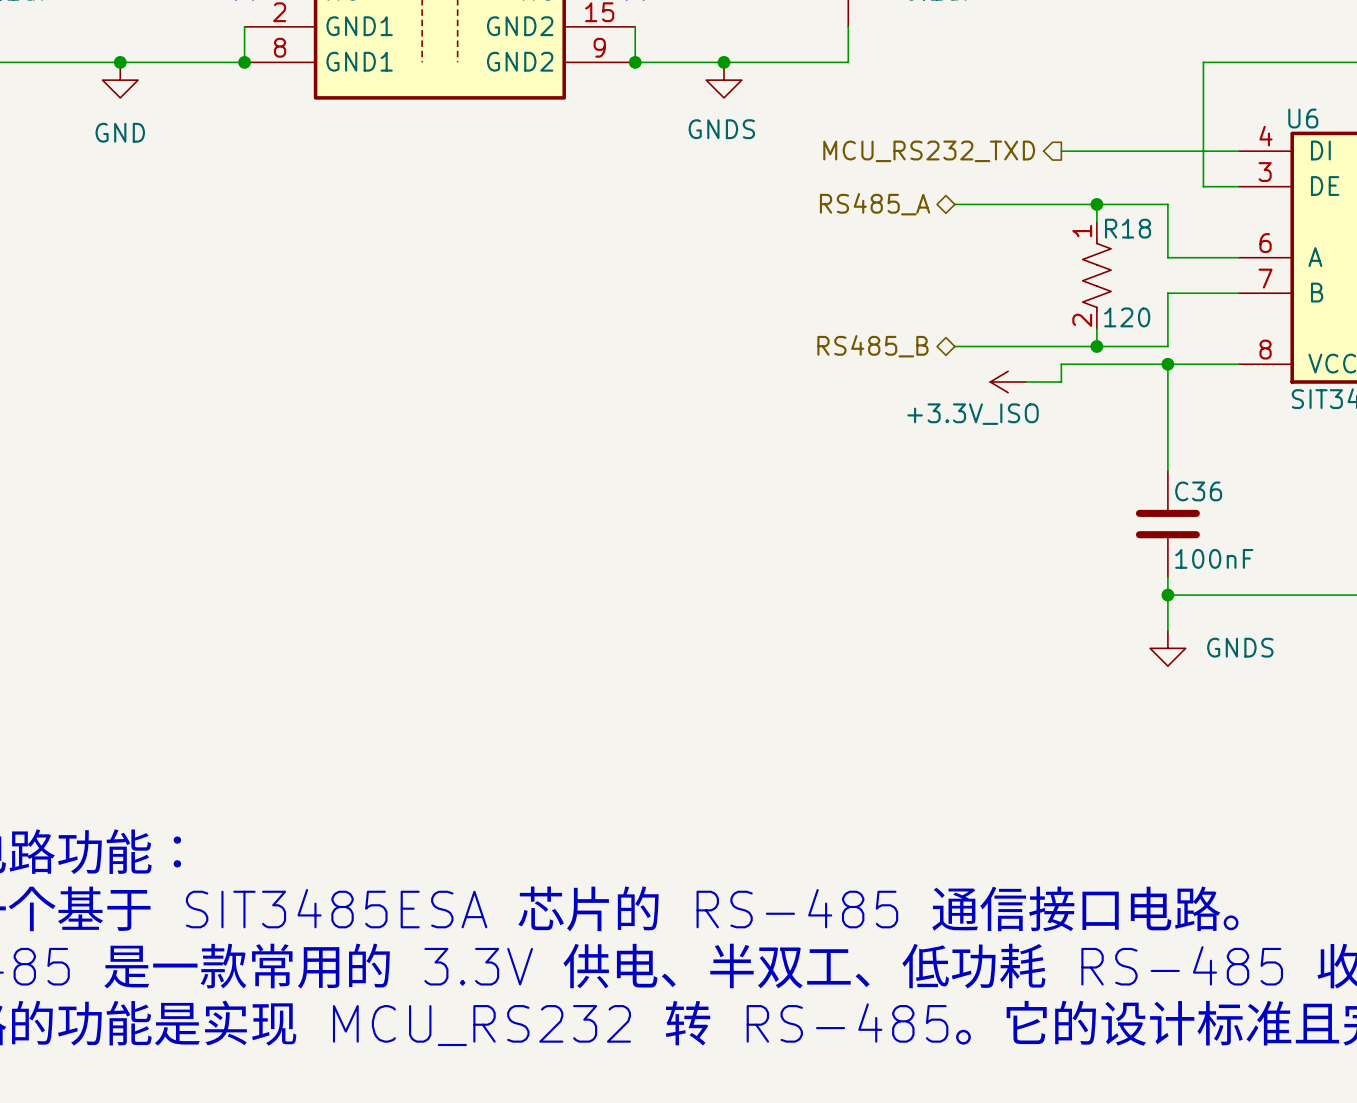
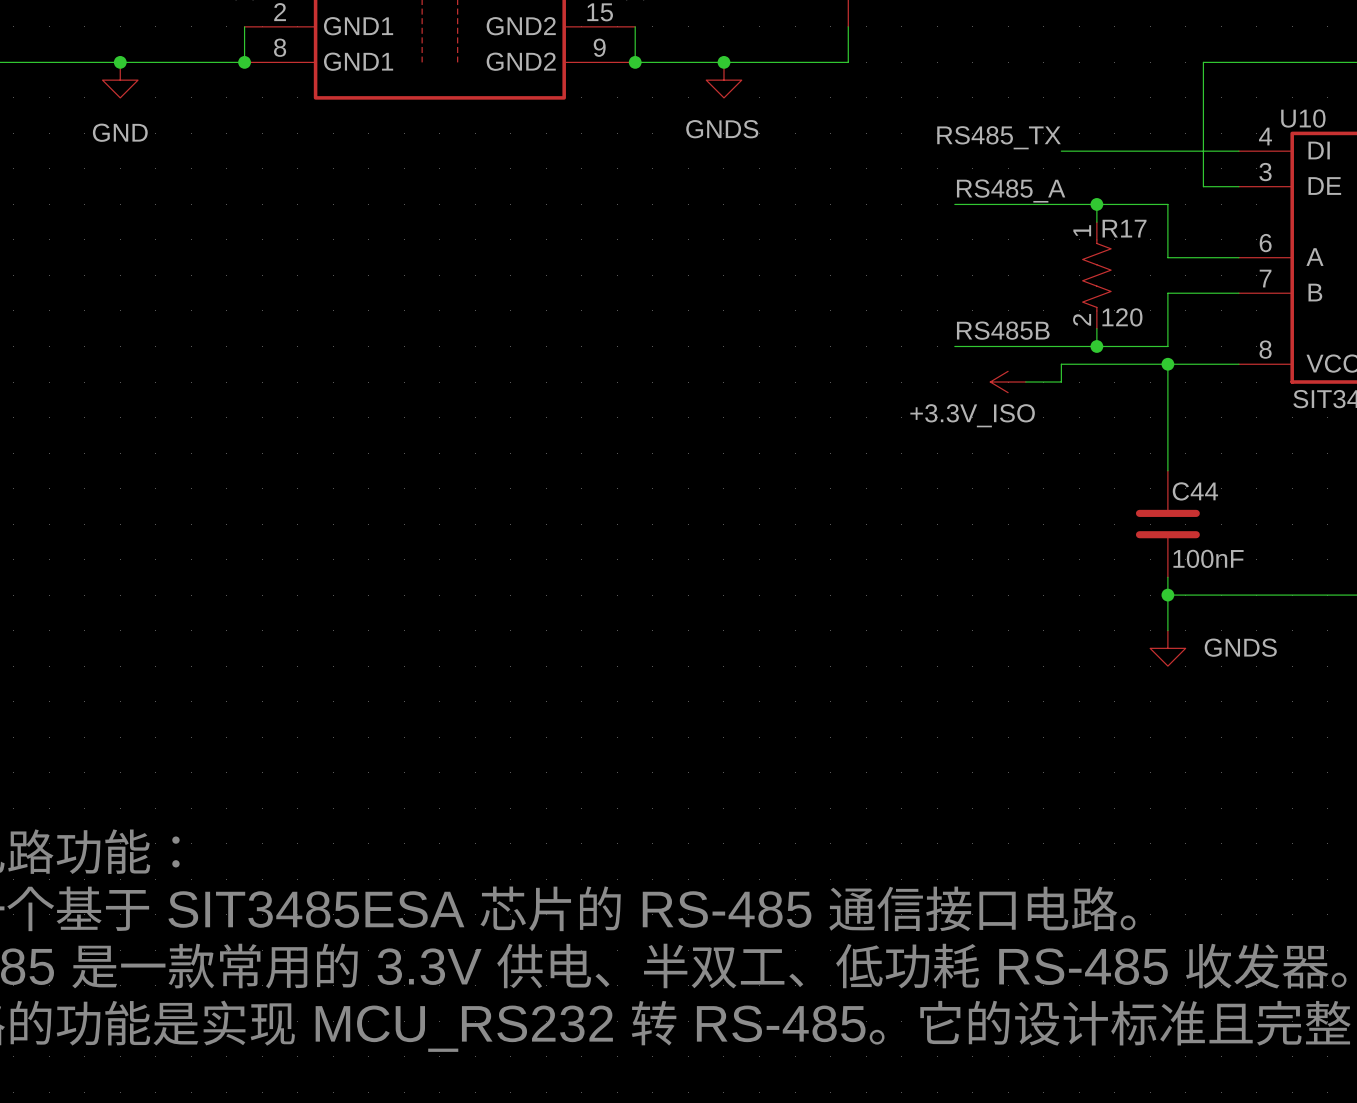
U6 name: U6 (1303, 118) -> U10 (1303, 118)
label: none -> RS485_TX (999, 137)
hierarchical label: MCU_RS232_TXD (929, 151) -> none
label: none -> RS485_A (1011, 191)
hierarchical label: RS485_A (875, 204) -> none
R18 name: R18 (1128, 228) -> R17 (1124, 228)
label: none -> RS485B (1003, 330)
hierarchical label: RS485_B (872, 346) -> none
C36 name: C36 (1198, 491) -> C44 (1195, 491)

